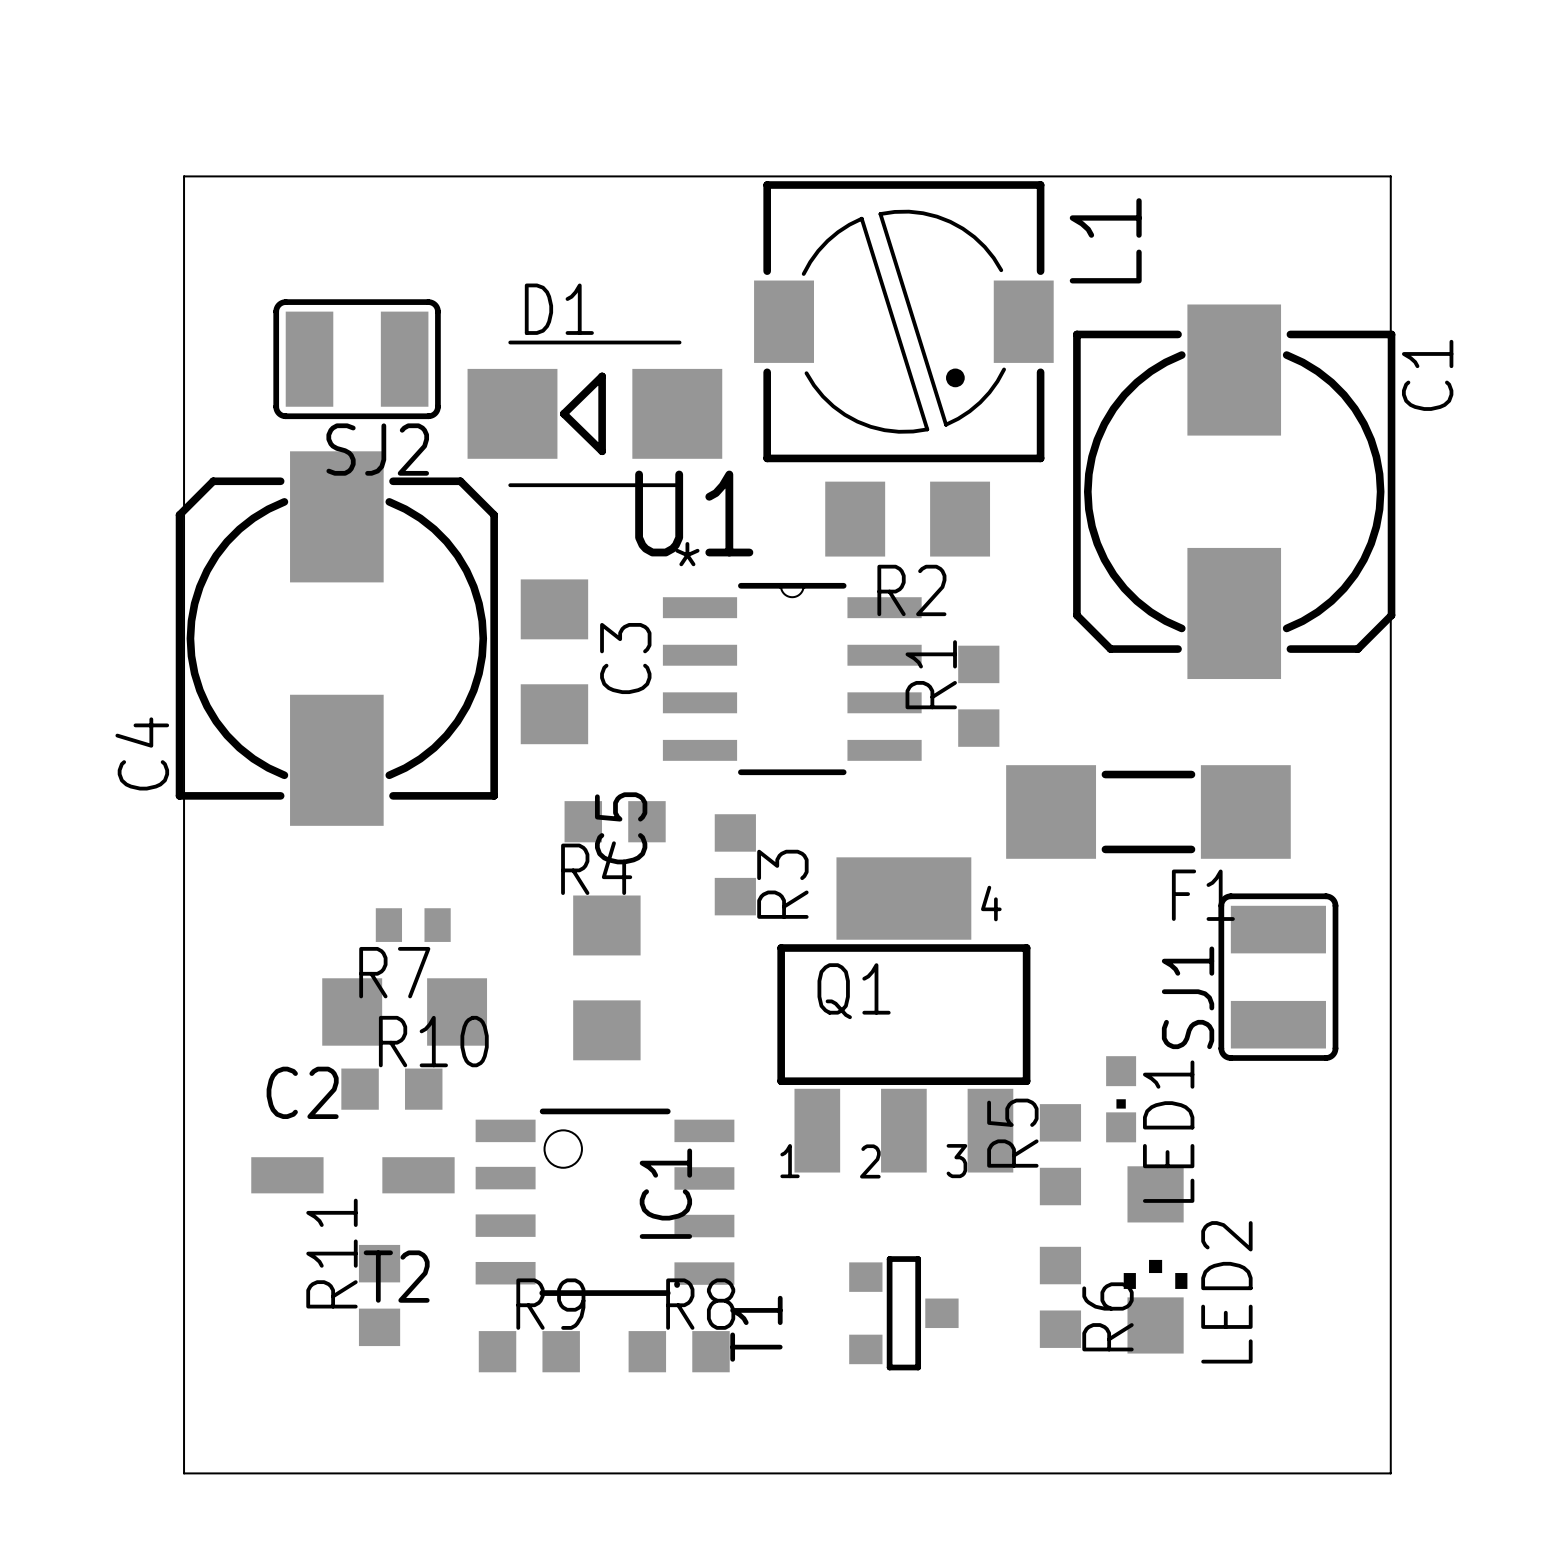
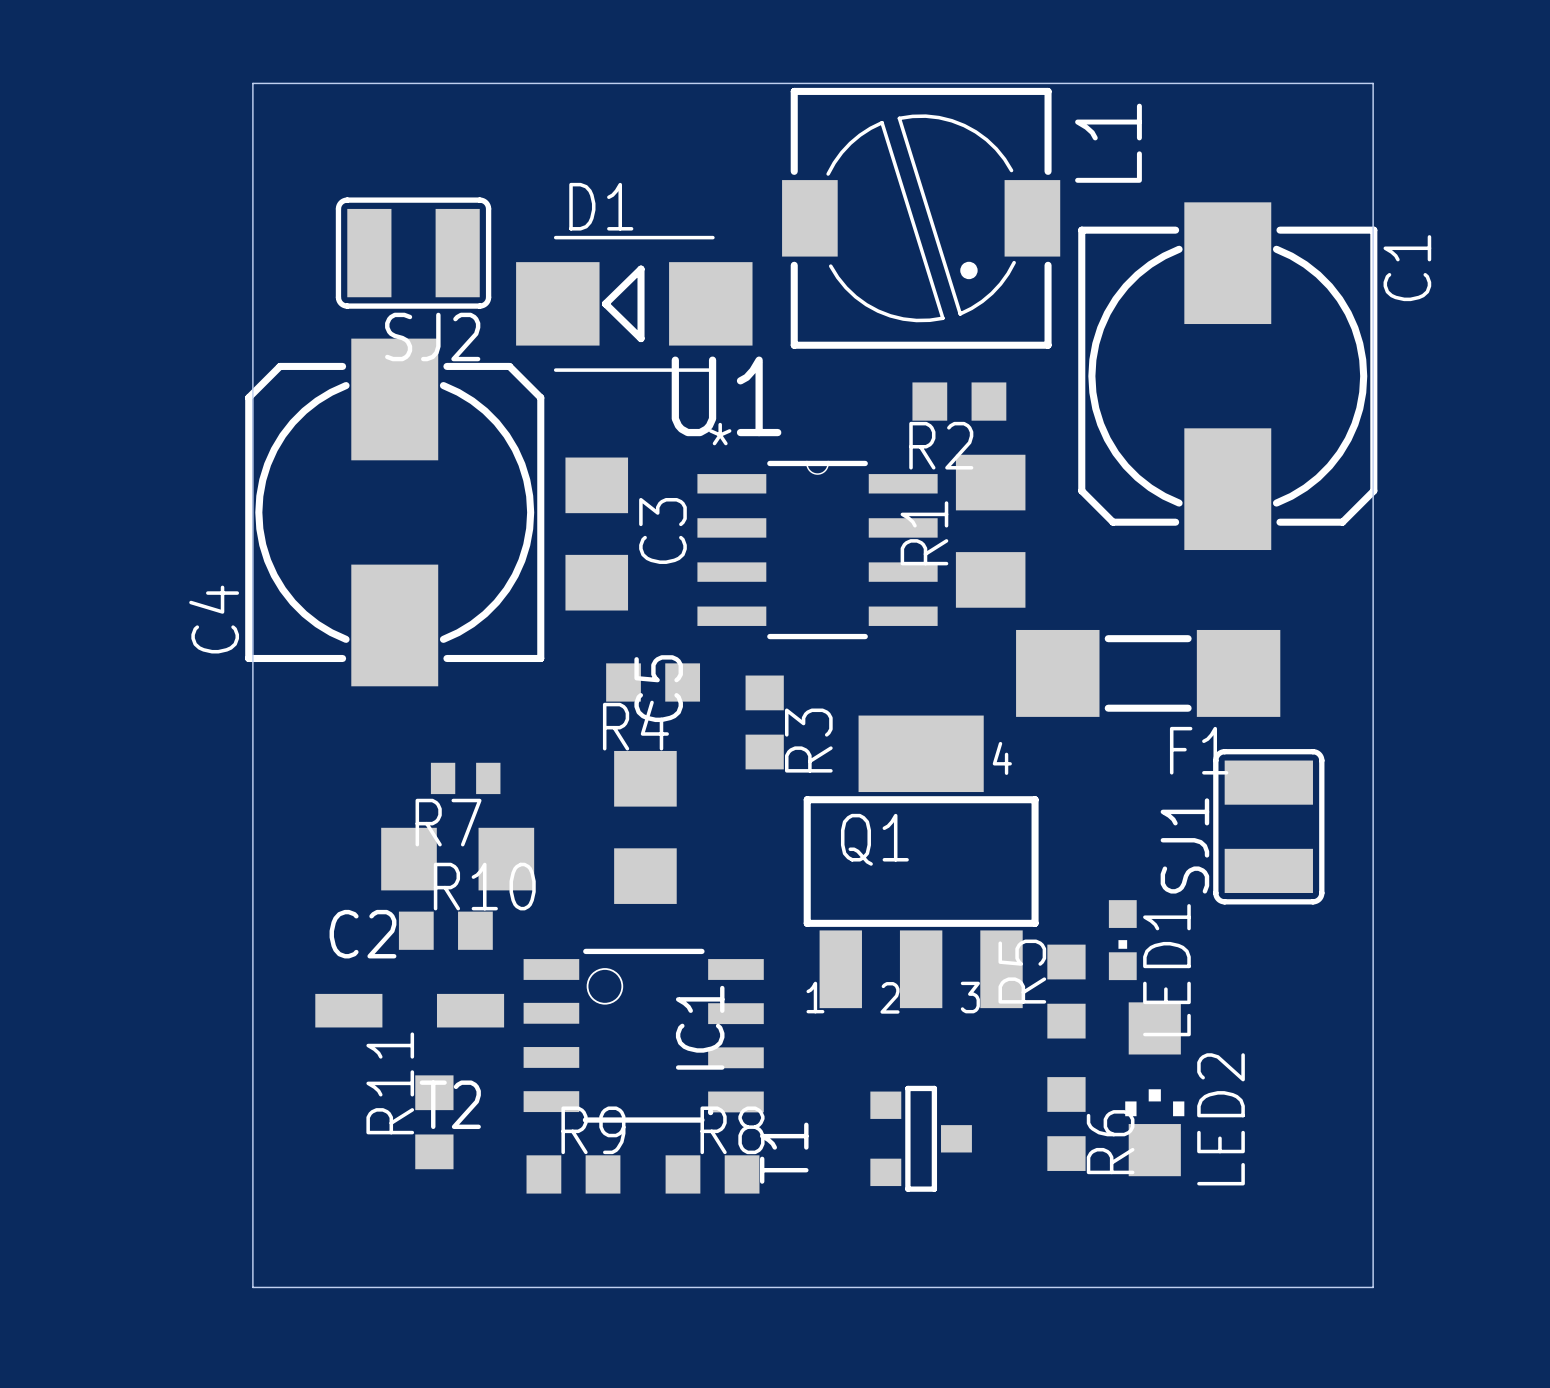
R2 footprint: [825, 481, 991, 557] -> [912, 382, 1007, 421]
R1 footprint: [958, 645, 1000, 747] -> [955, 454, 1026, 608]

